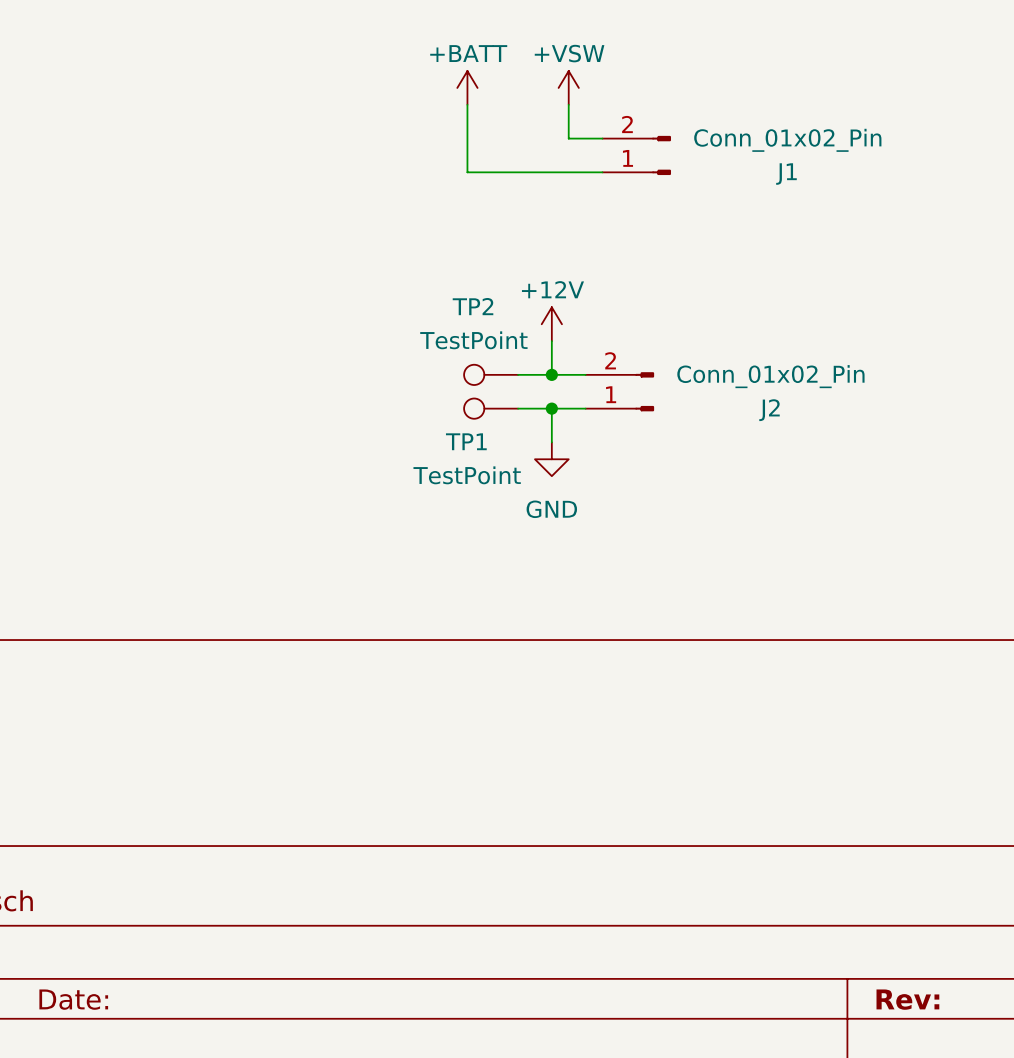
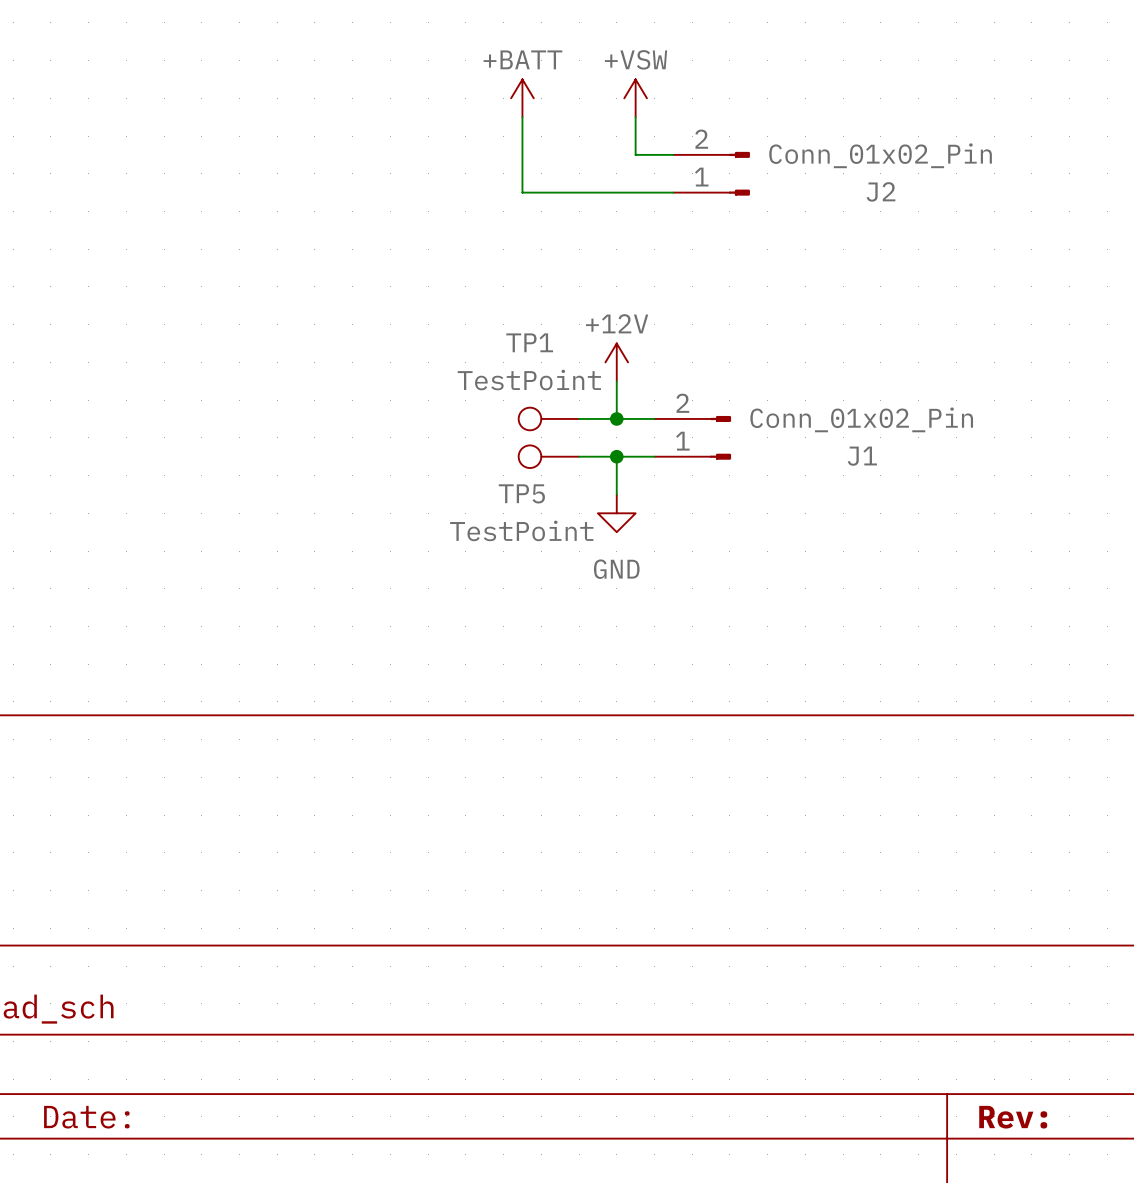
J1 name: J1 (786, 174) -> J2 (881, 191)
TP2 name: TP2 (473, 306) -> TP1 (529, 342)
J2 name: J2 (769, 410) -> J1 (862, 456)
TP1 name: TP1 (466, 441) -> TP5 (521, 493)

